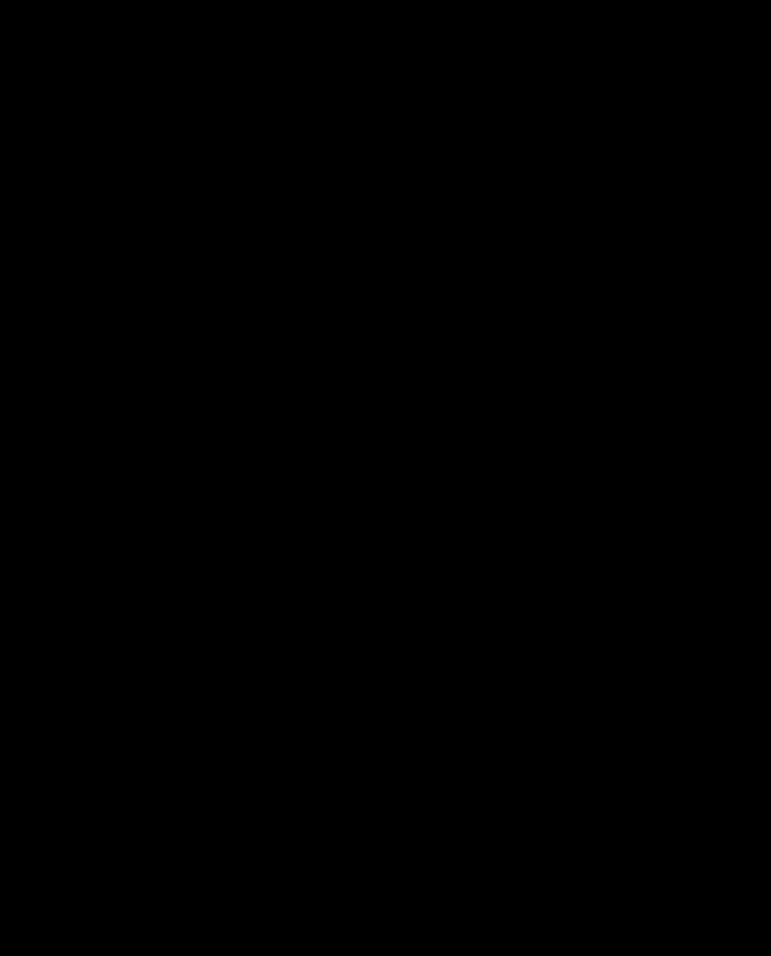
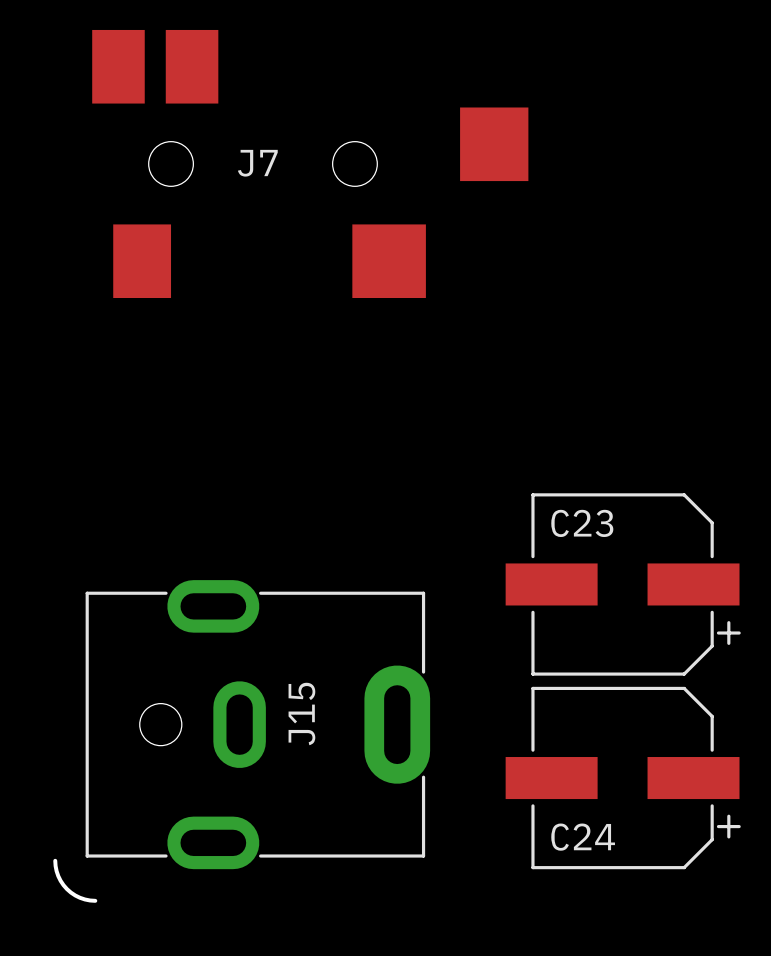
J7: none -> (310, 163)
C23: none -> (623, 584)
J15: none -> (257, 724)
C24: none -> (623, 778)
board edge: none -> (55, 860) (58, 876) (66, 889) (79, 897) (95, 900)

